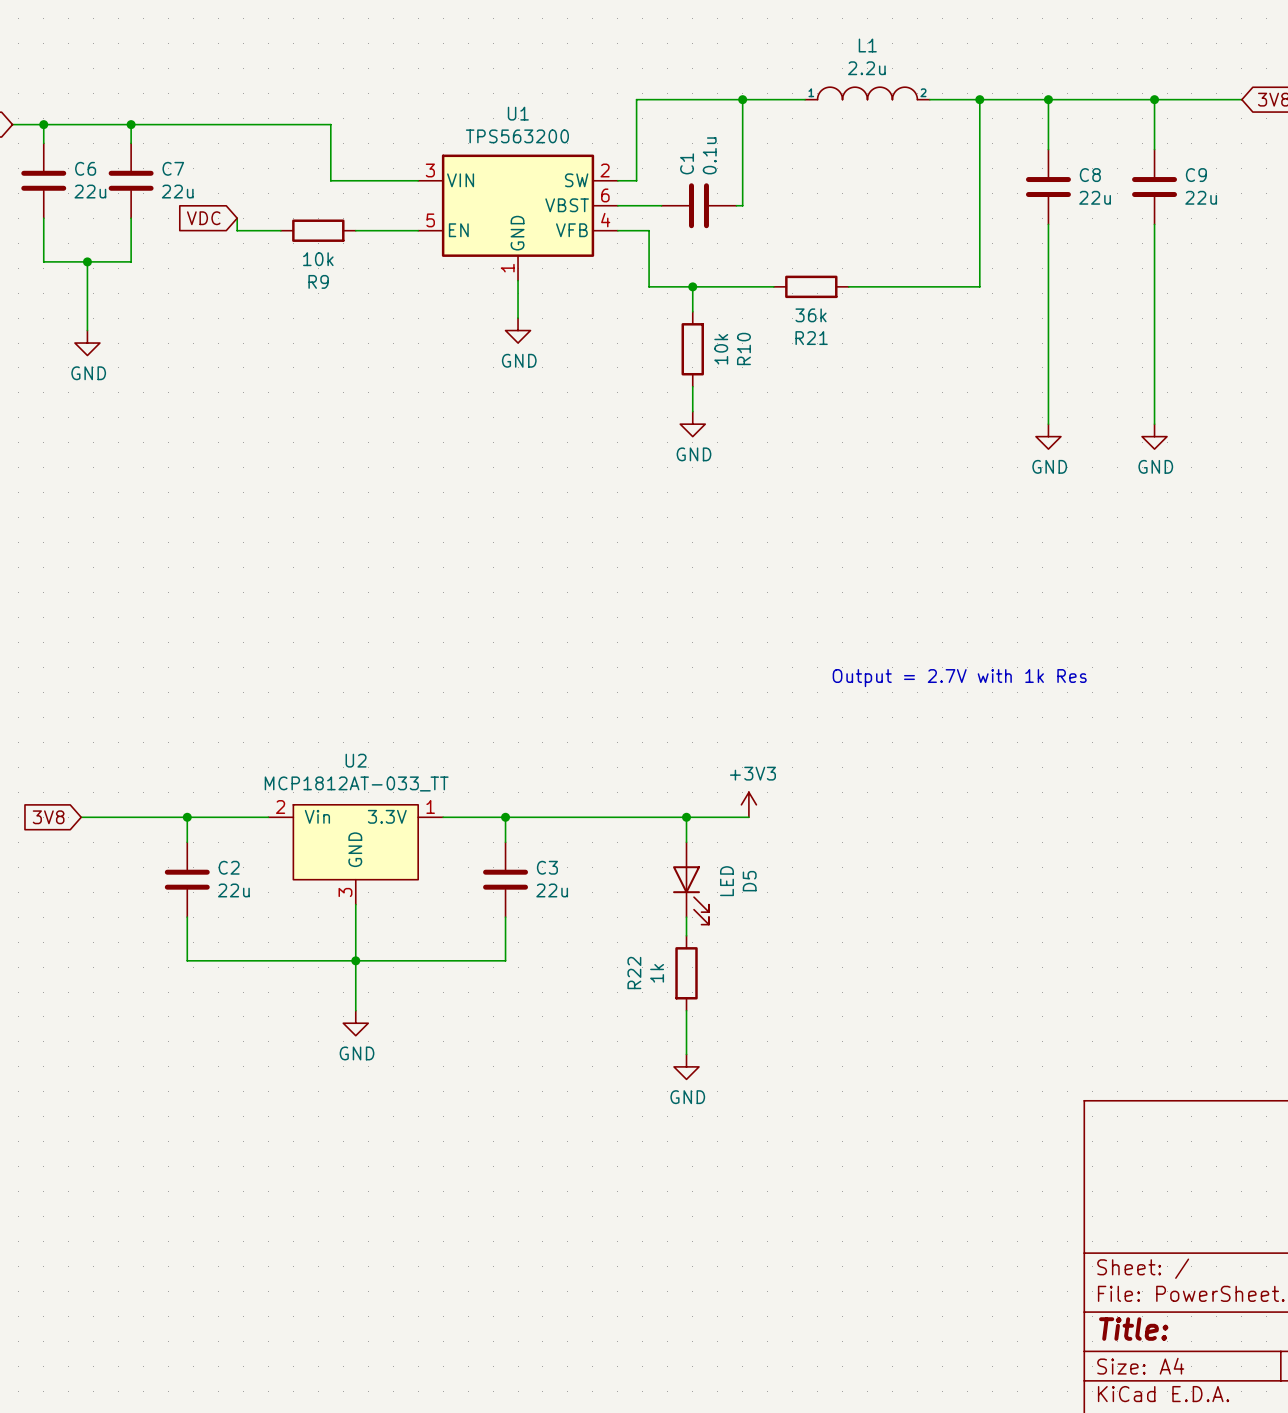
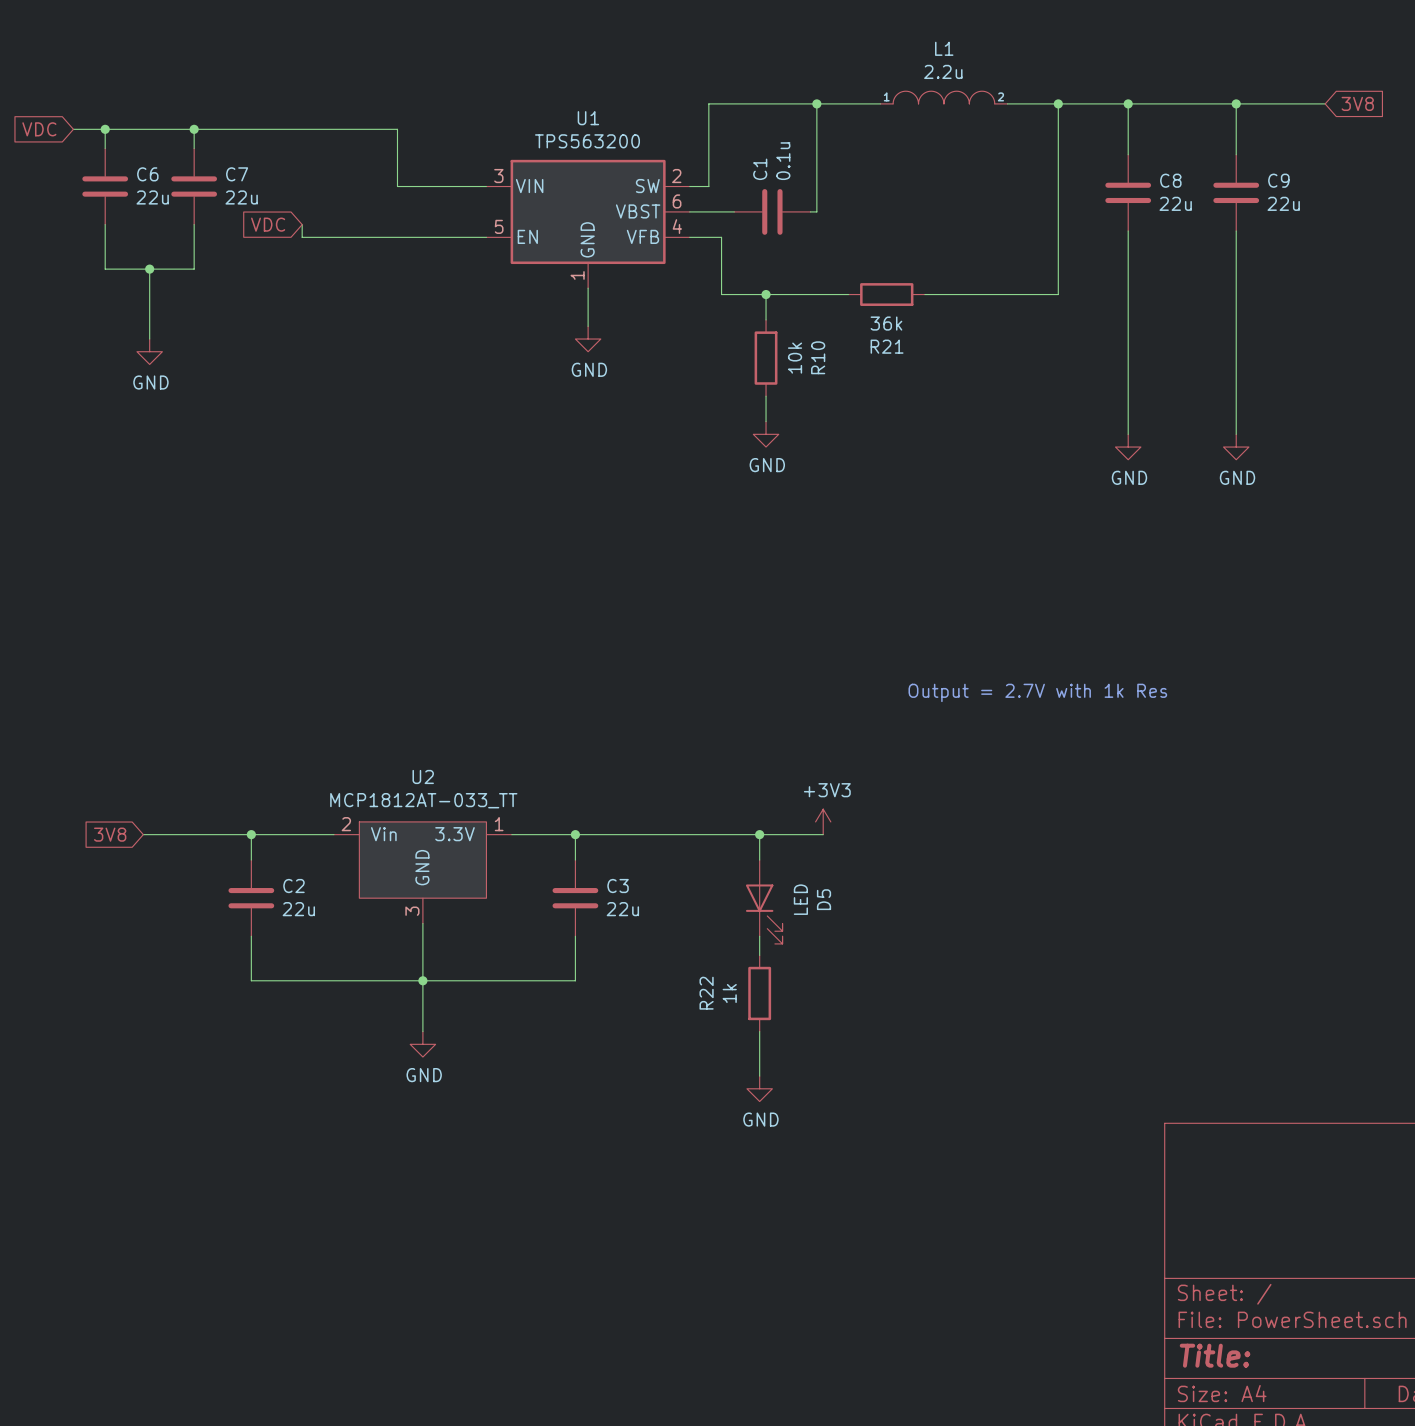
wire: none -> (346, 237) (422, 237)
R9: 10k (318, 230) -> none

